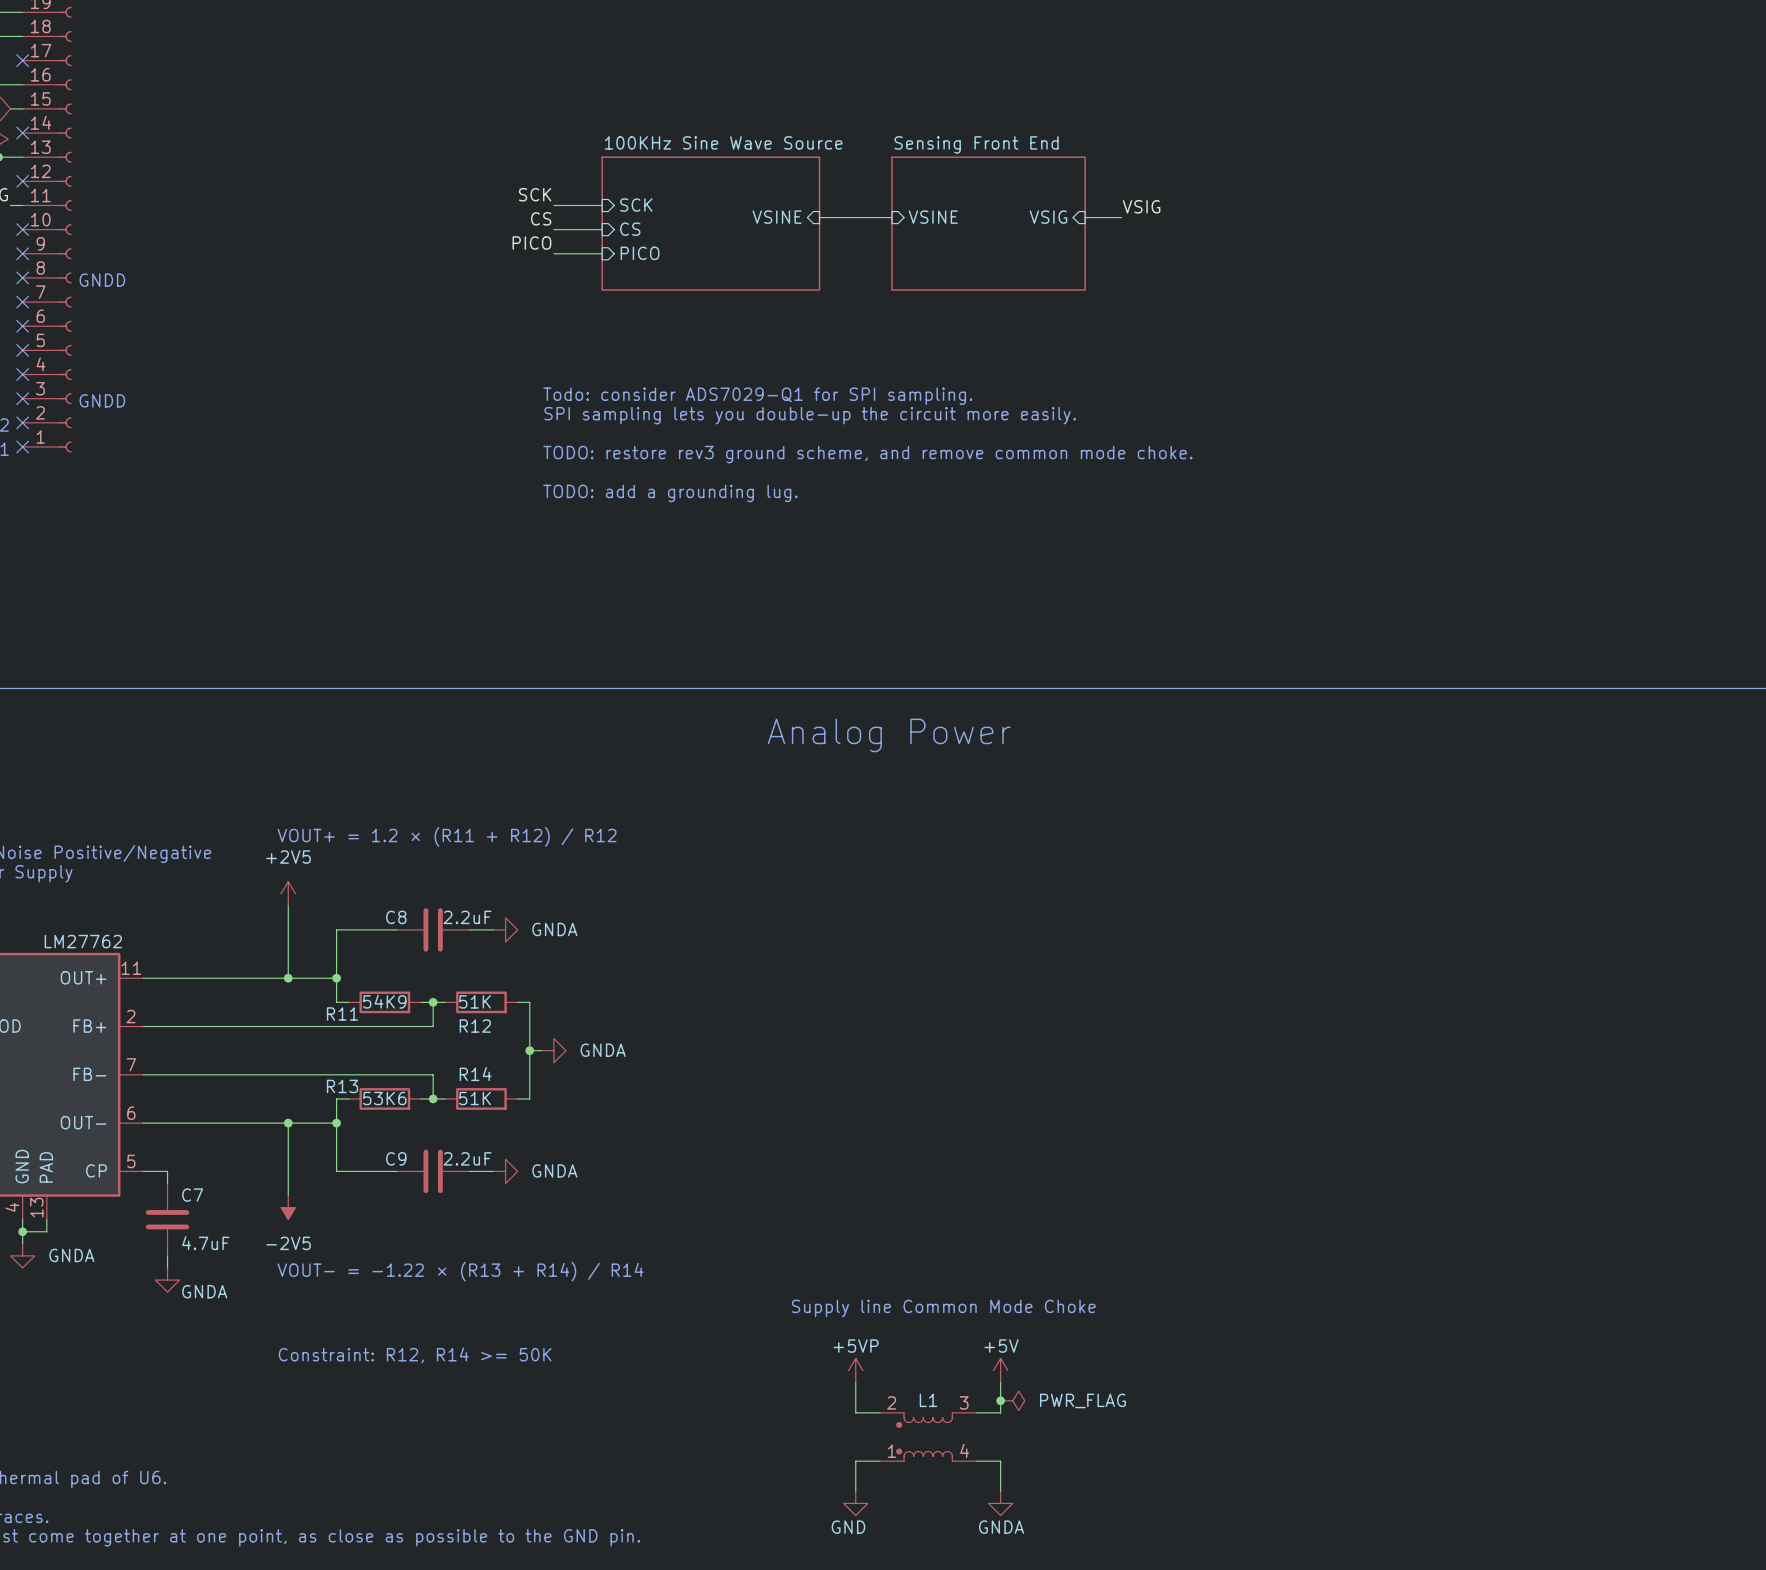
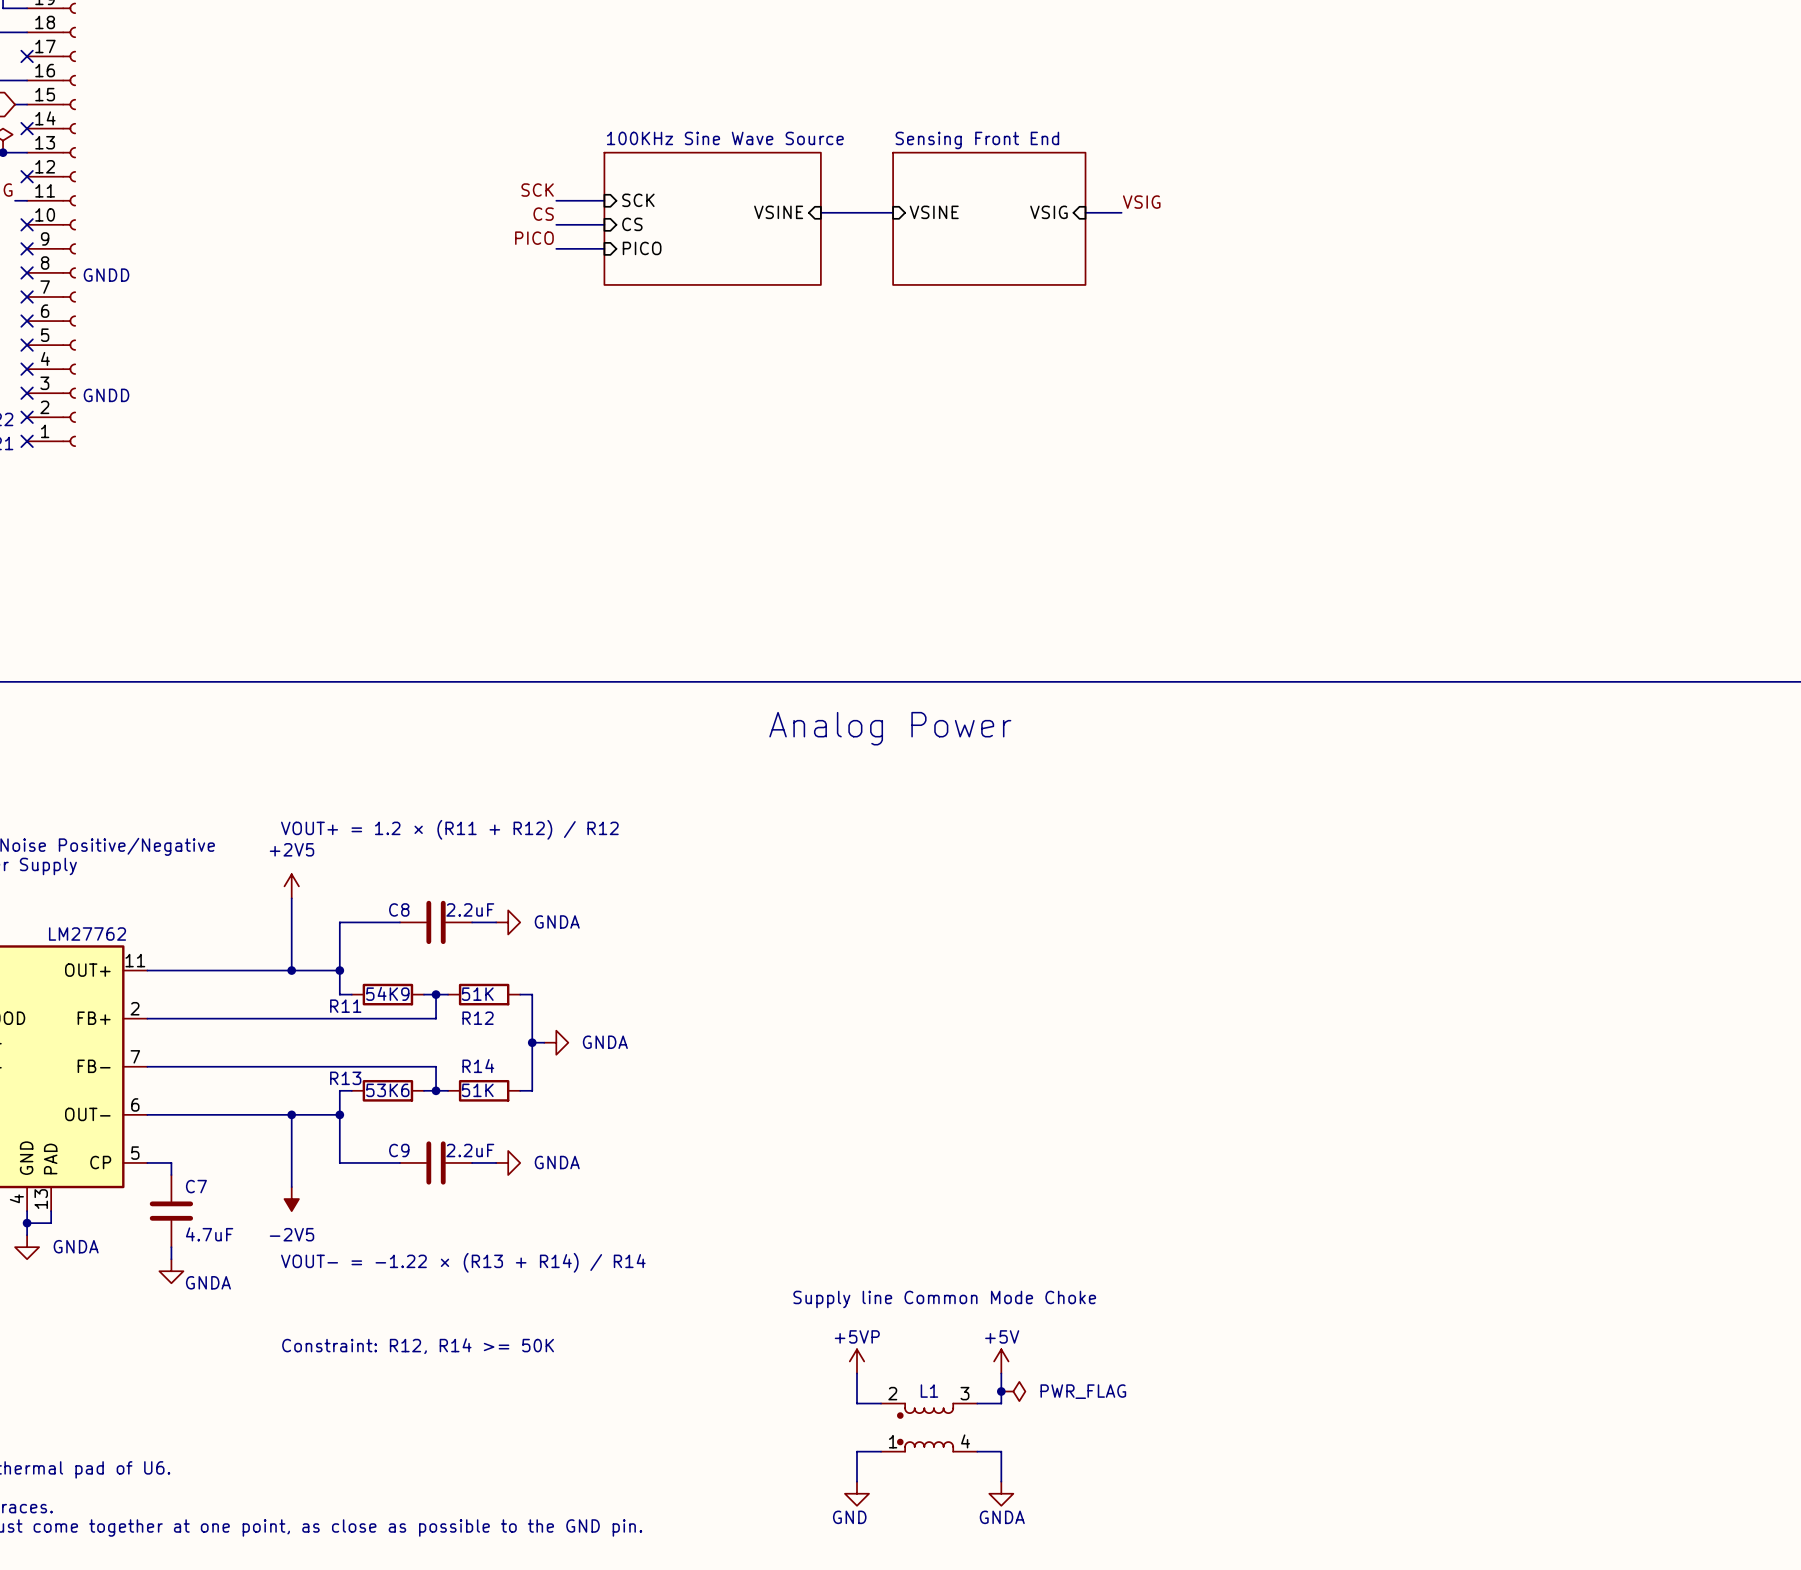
text: Todo: consider ADS7029-Q1 for SPI sampling. (757, 396) -> none
text: SPI sampling lets you double-up the circuit more easily. (810, 415) -> none
text: TODO: restore rev3 ground scheme, and remove common mode choke. (867, 454) -> none
text: TODO: add a grounding lug. (670, 493) -> none

